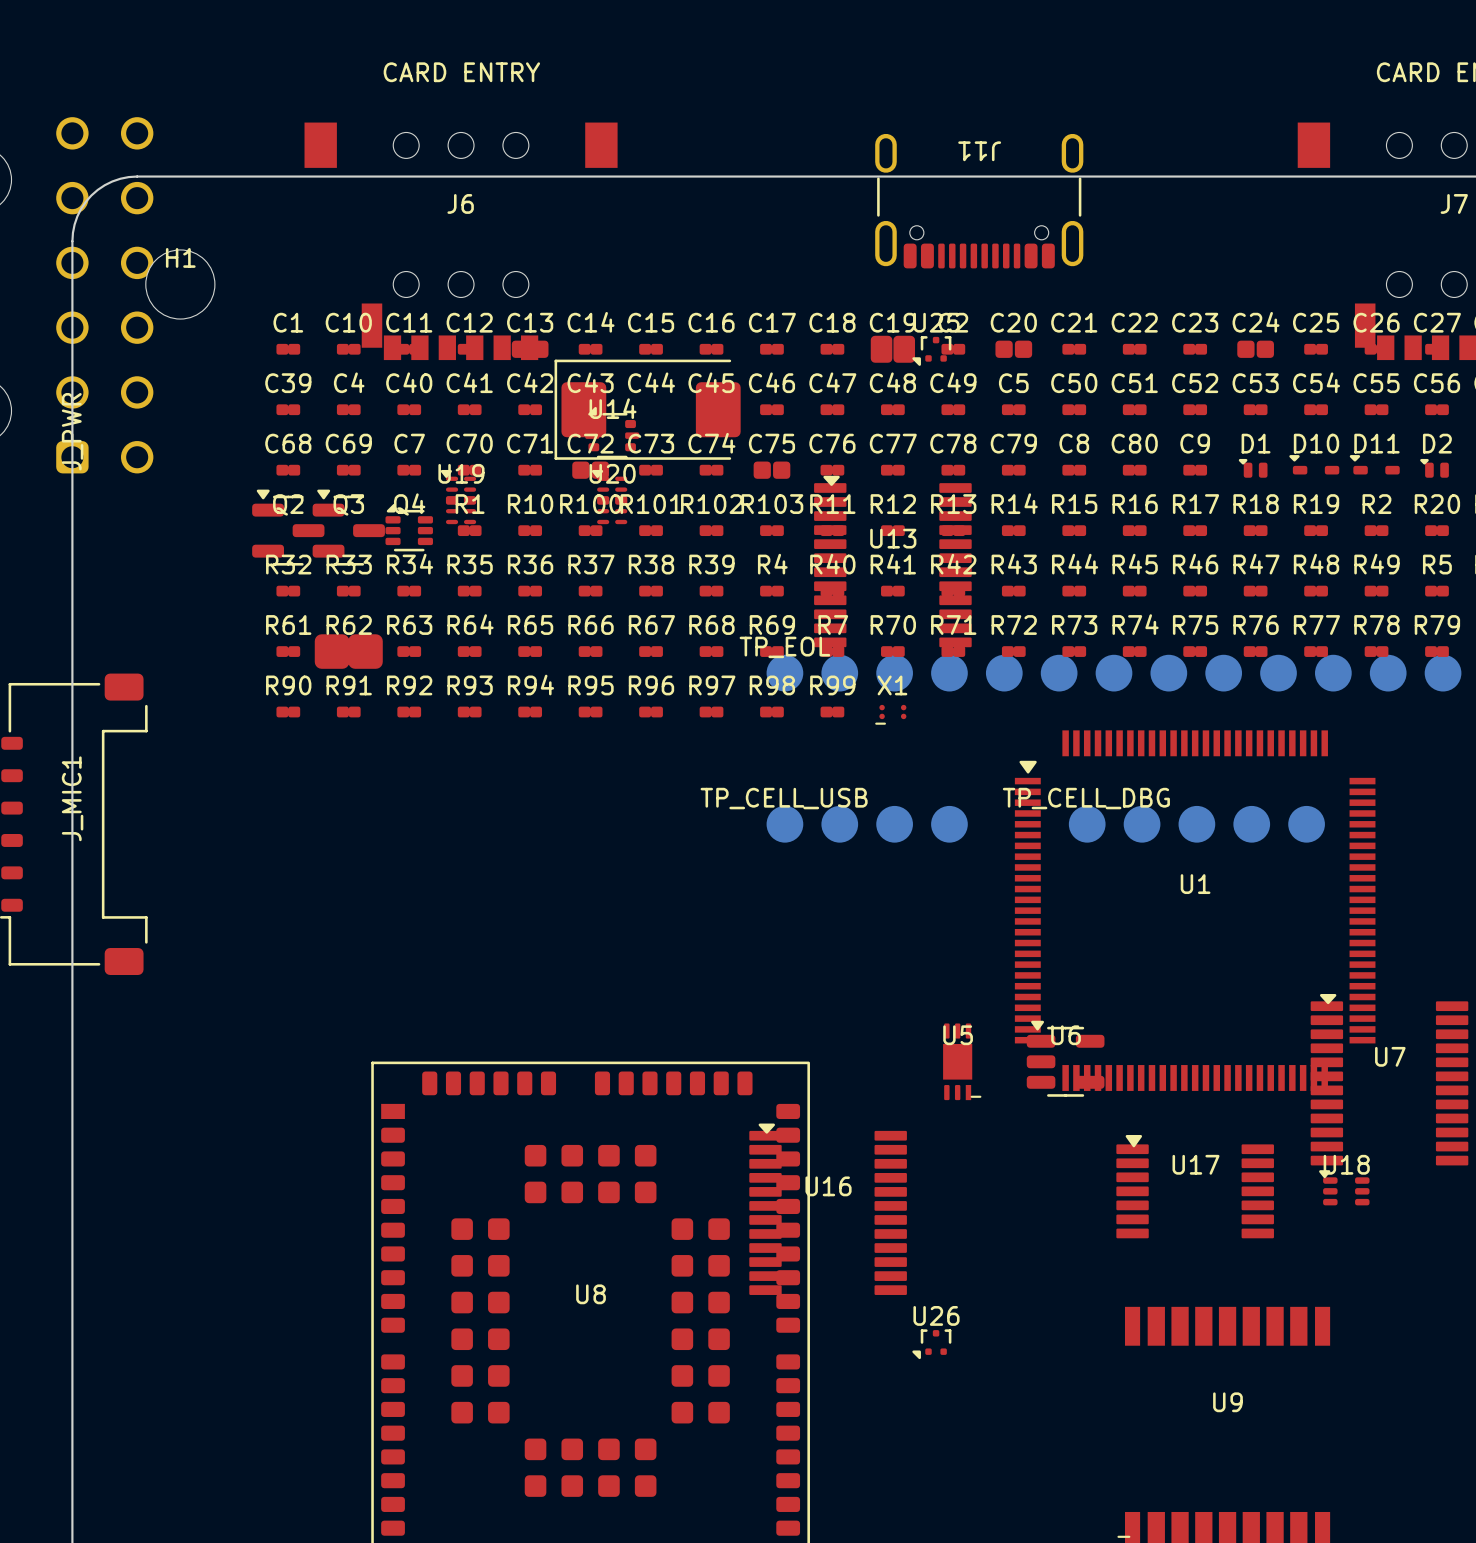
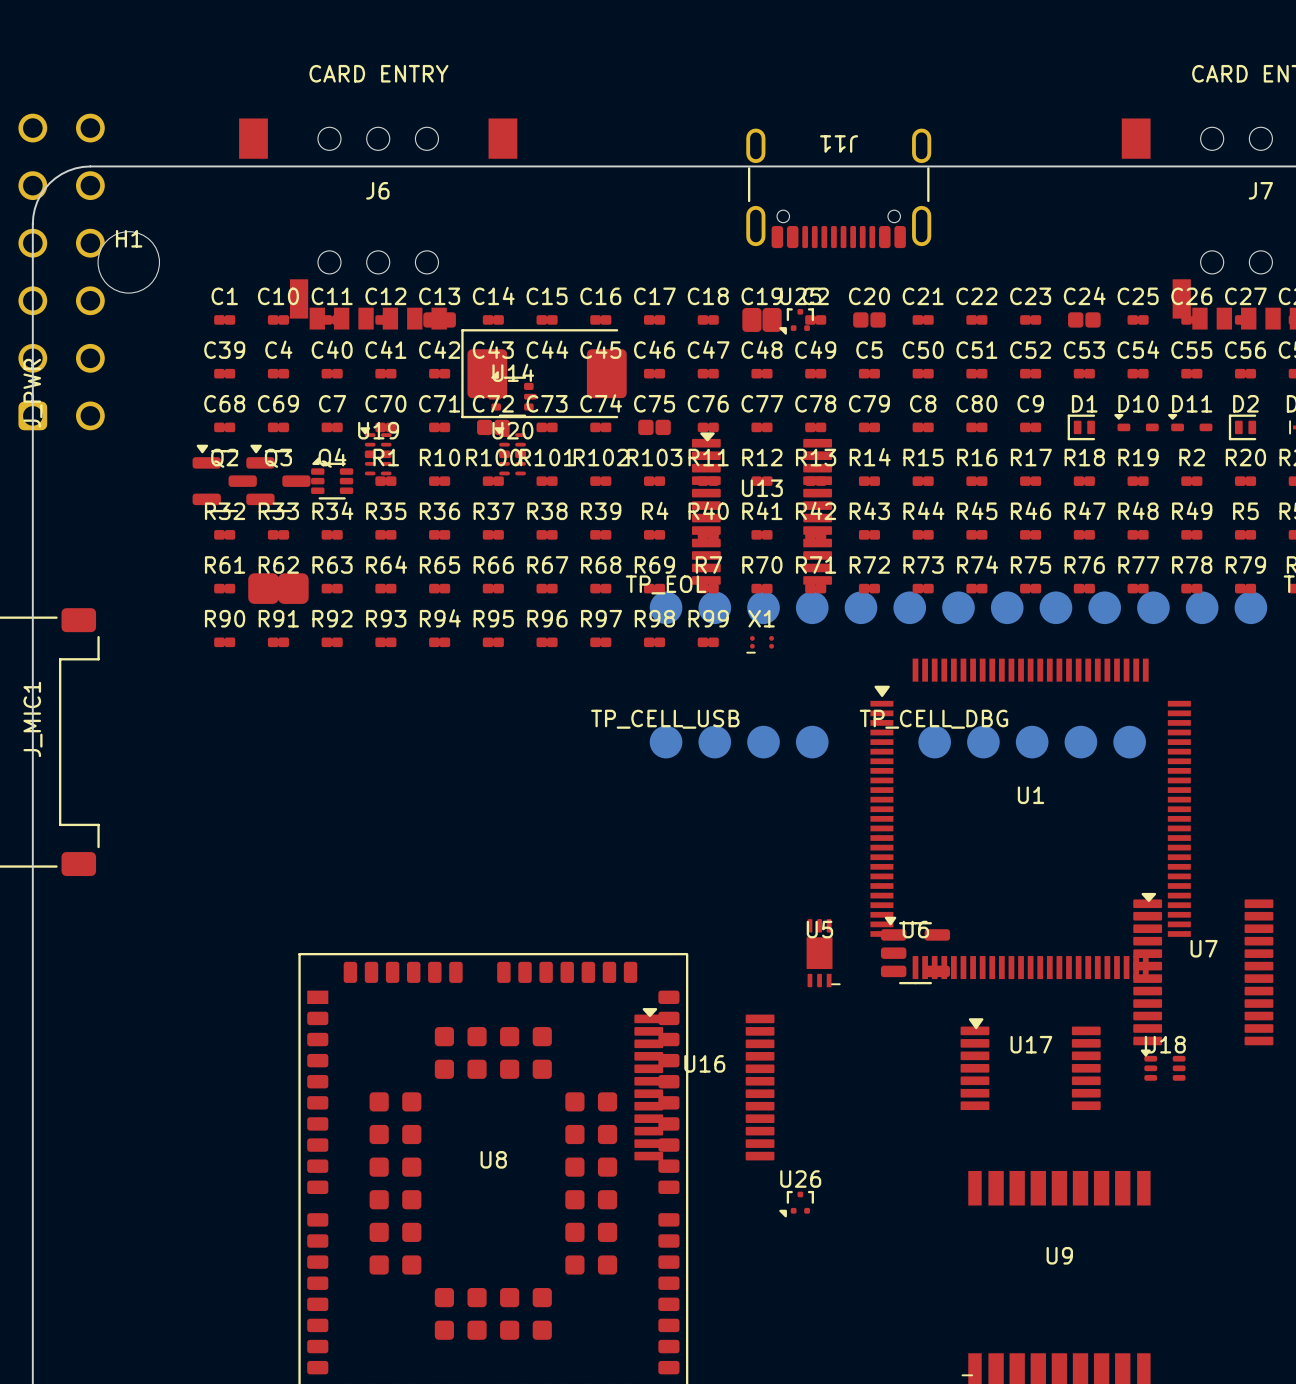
D1 footprint: [1238, 458, 1268, 478] -> [1067, 414, 1096, 441]
D2 footprint: [1420, 458, 1449, 478] -> [1228, 414, 1257, 441]

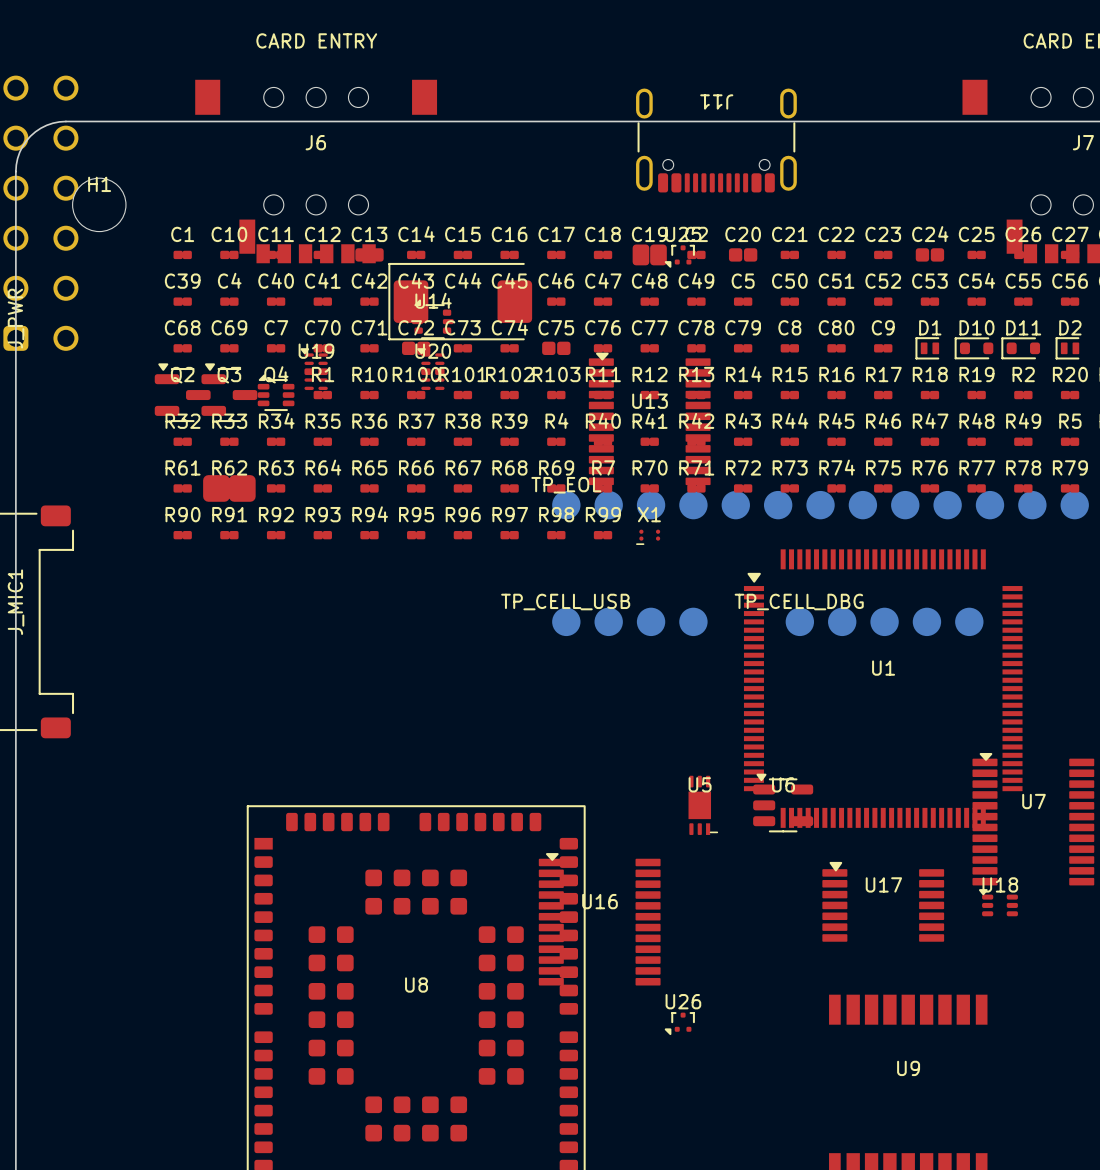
D10 footprint: [1114, 413, 1159, 432] -> [954, 337, 994, 360]
D11 footprint: [1168, 413, 1213, 432] -> [1001, 337, 1041, 360]

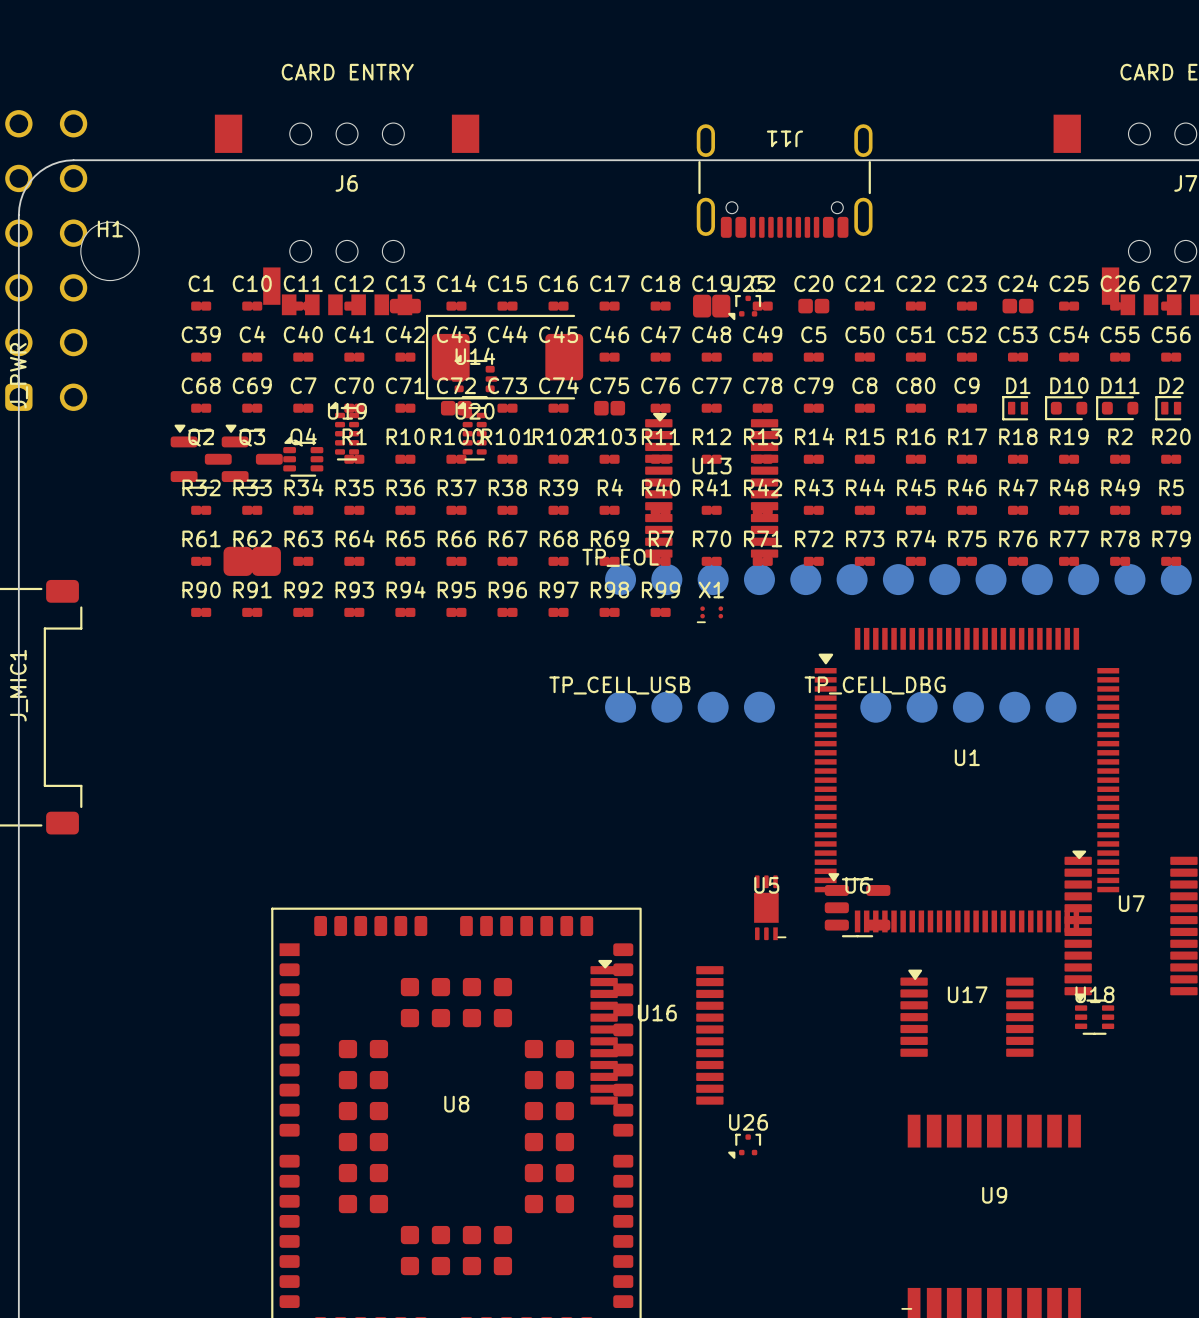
U19 footprint: [300, 348, 328, 391] -> [329, 401, 360, 461]
U20 footprint: [417, 348, 445, 391] -> [457, 401, 487, 461]
U18 footprint: [978, 889, 1018, 917] -> [1074, 993, 1115, 1035]

